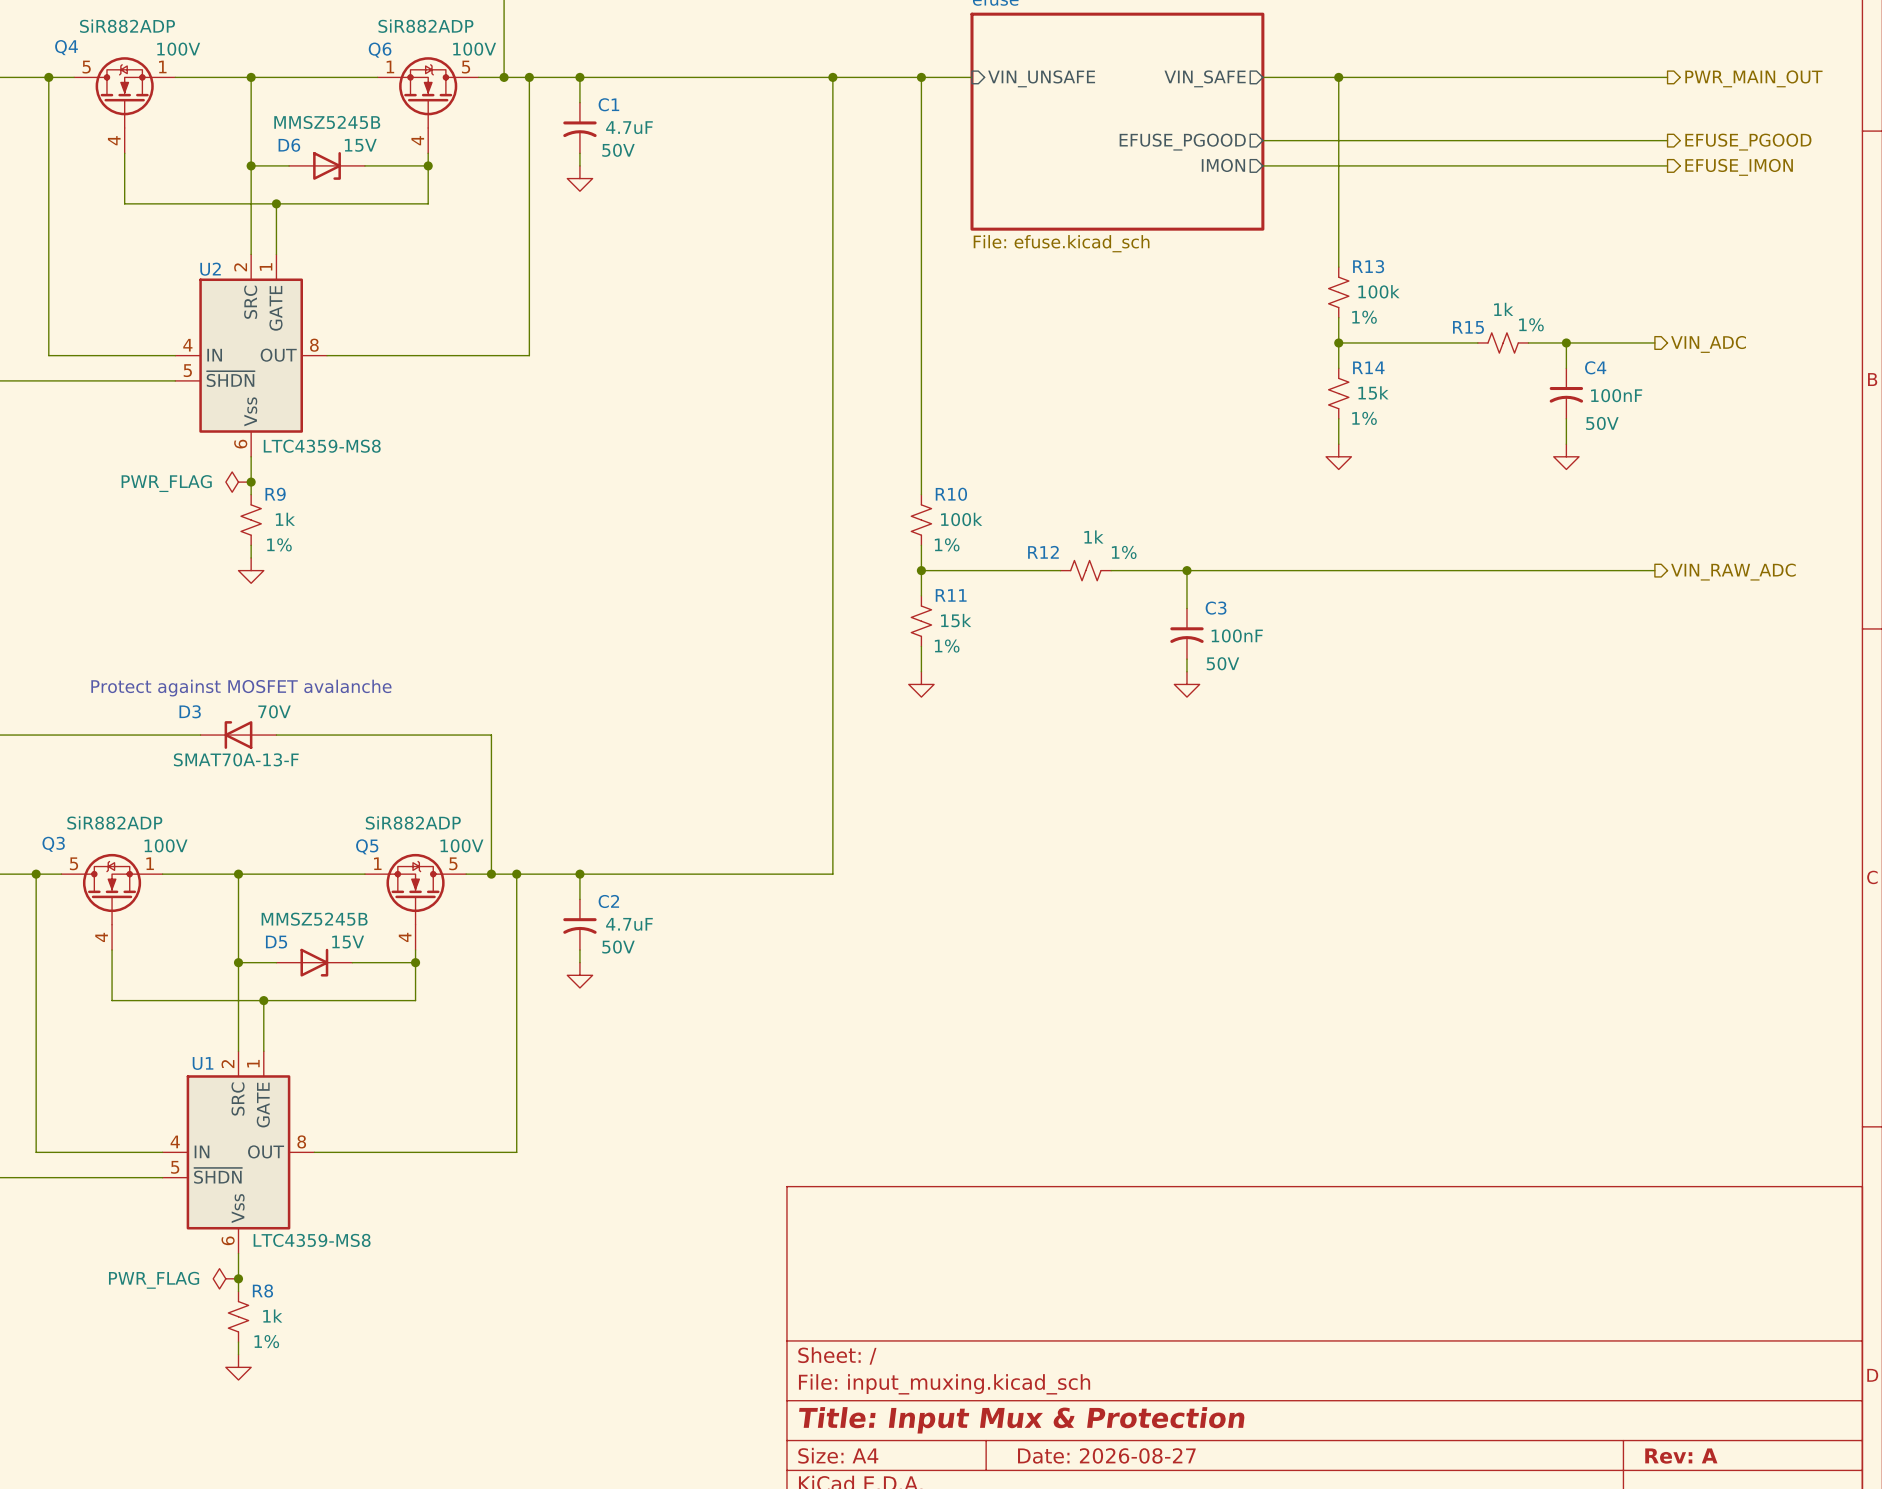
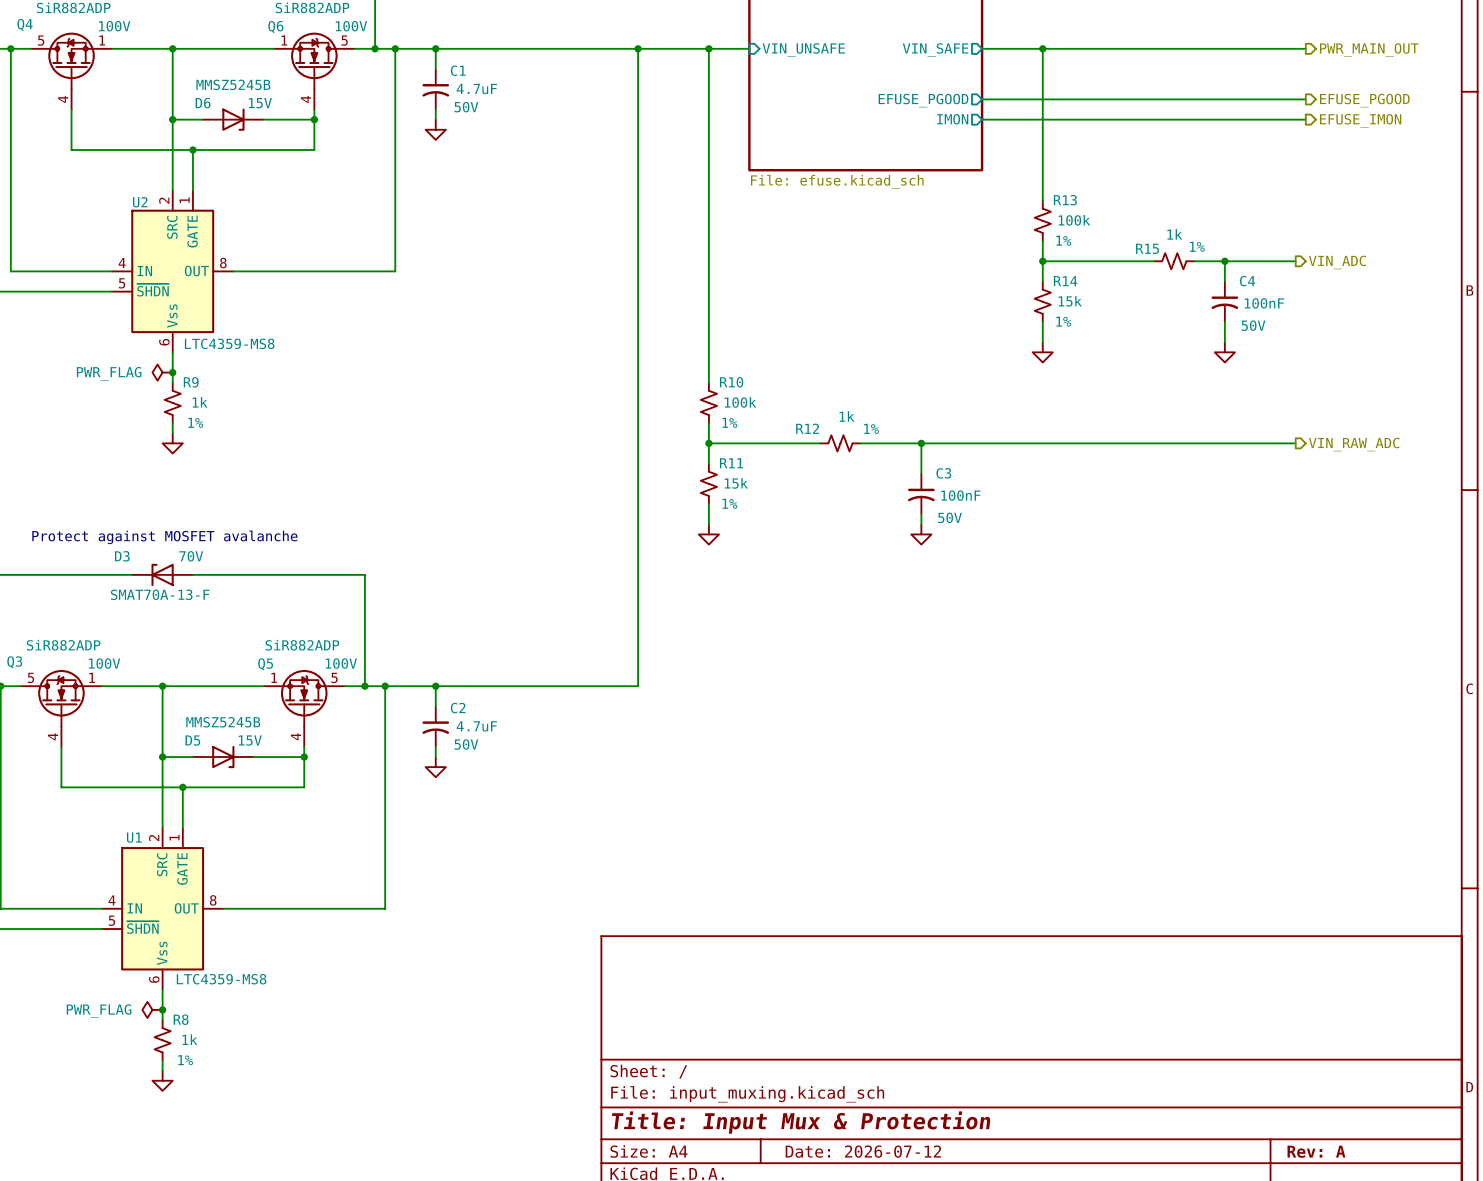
title block: Date: 2026-08-27 (1106, 1455) -> Date: 2026-07-12 (863, 1151)

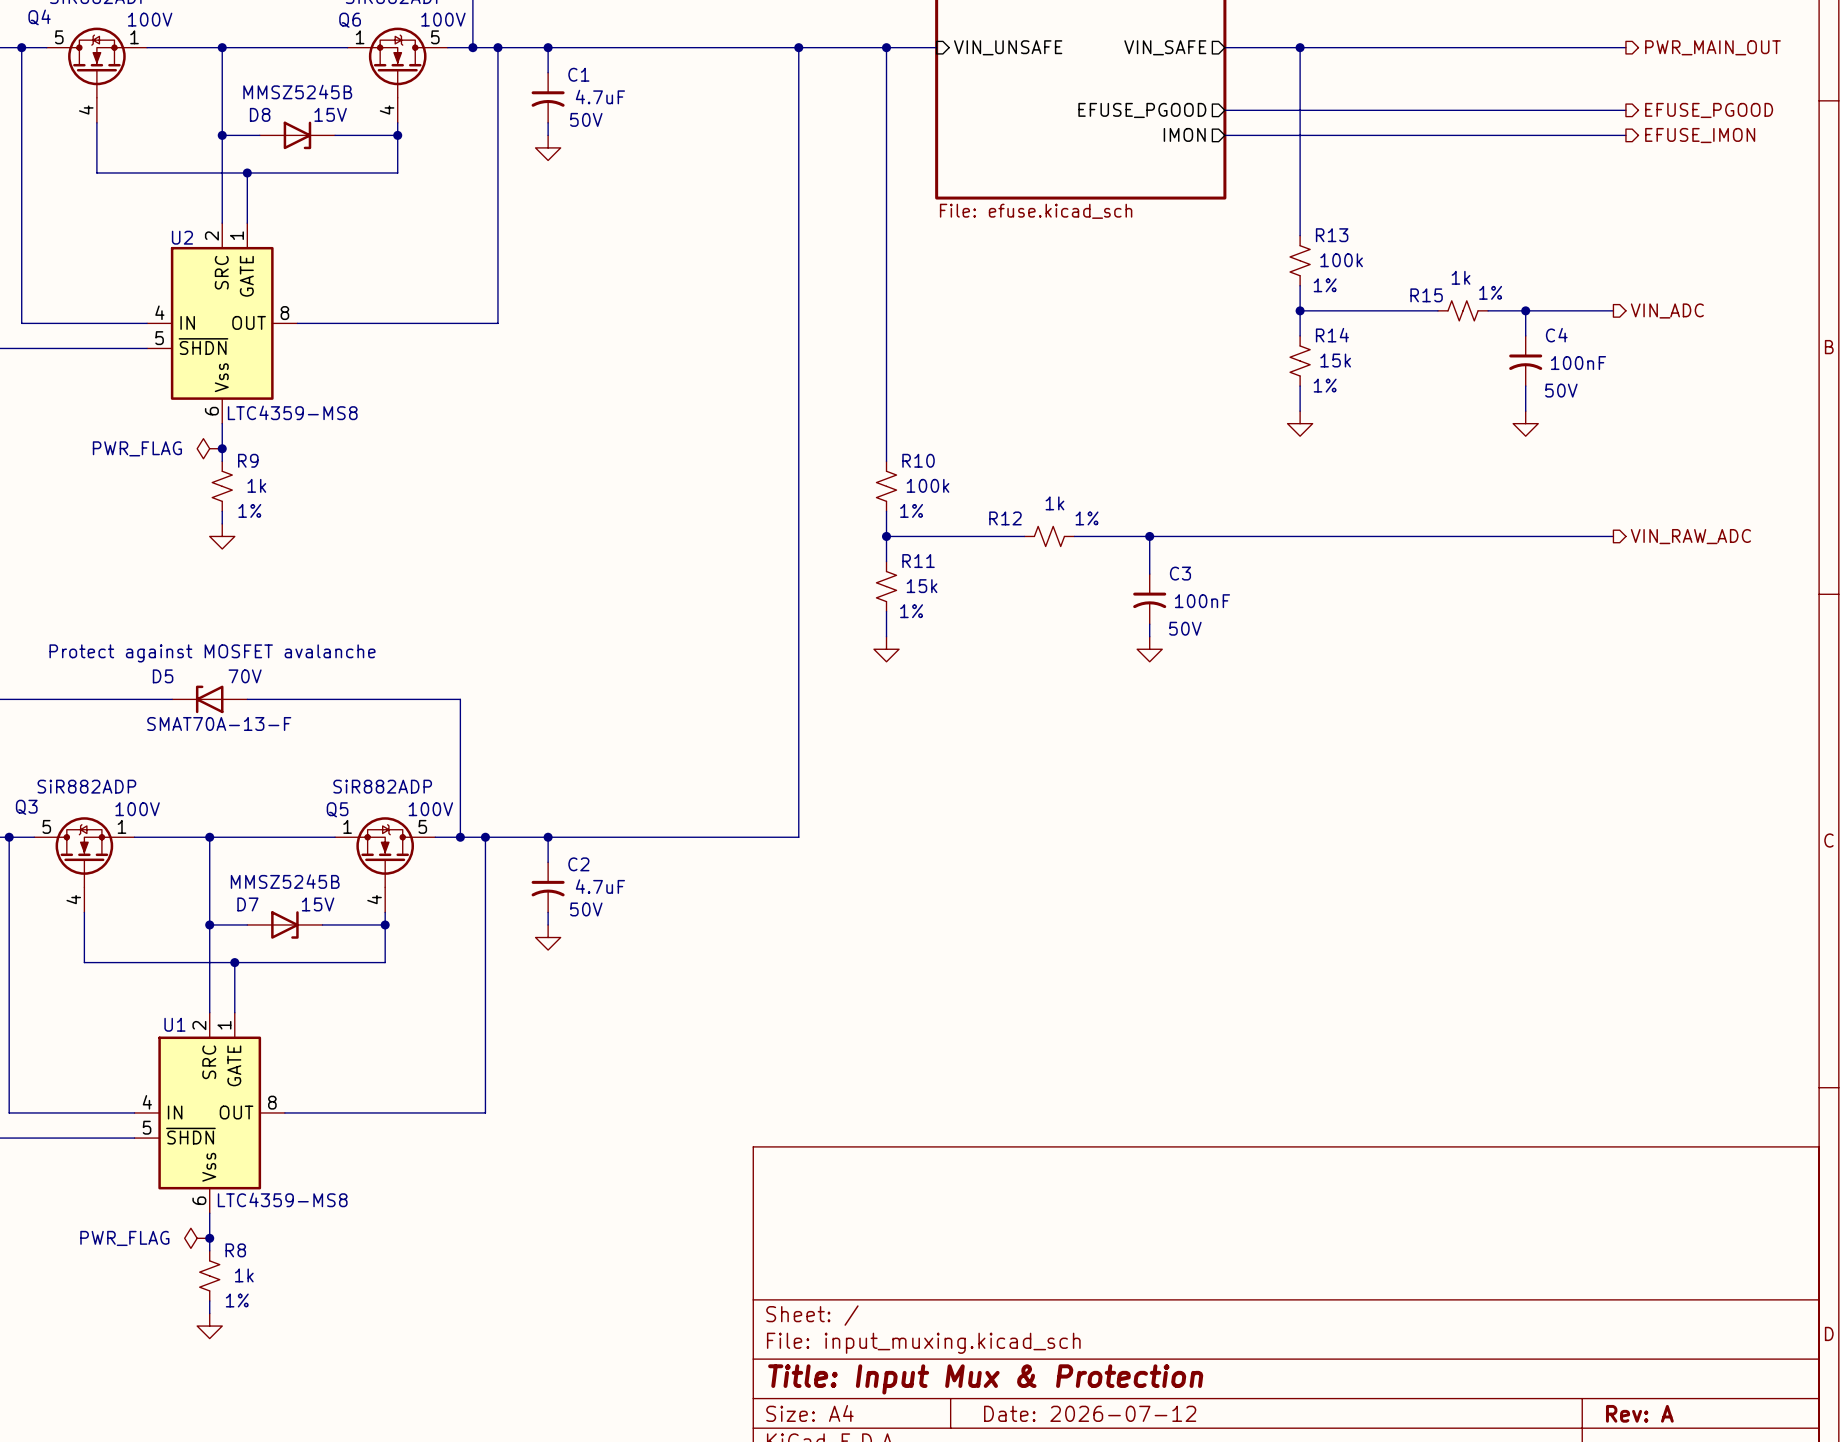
D6 name: D6 (203, 103) -> D8 (260, 114)
D3 name: D3 (122, 556) -> D5 (163, 676)
D5 name: D5 (192, 740) -> D7 (247, 904)

